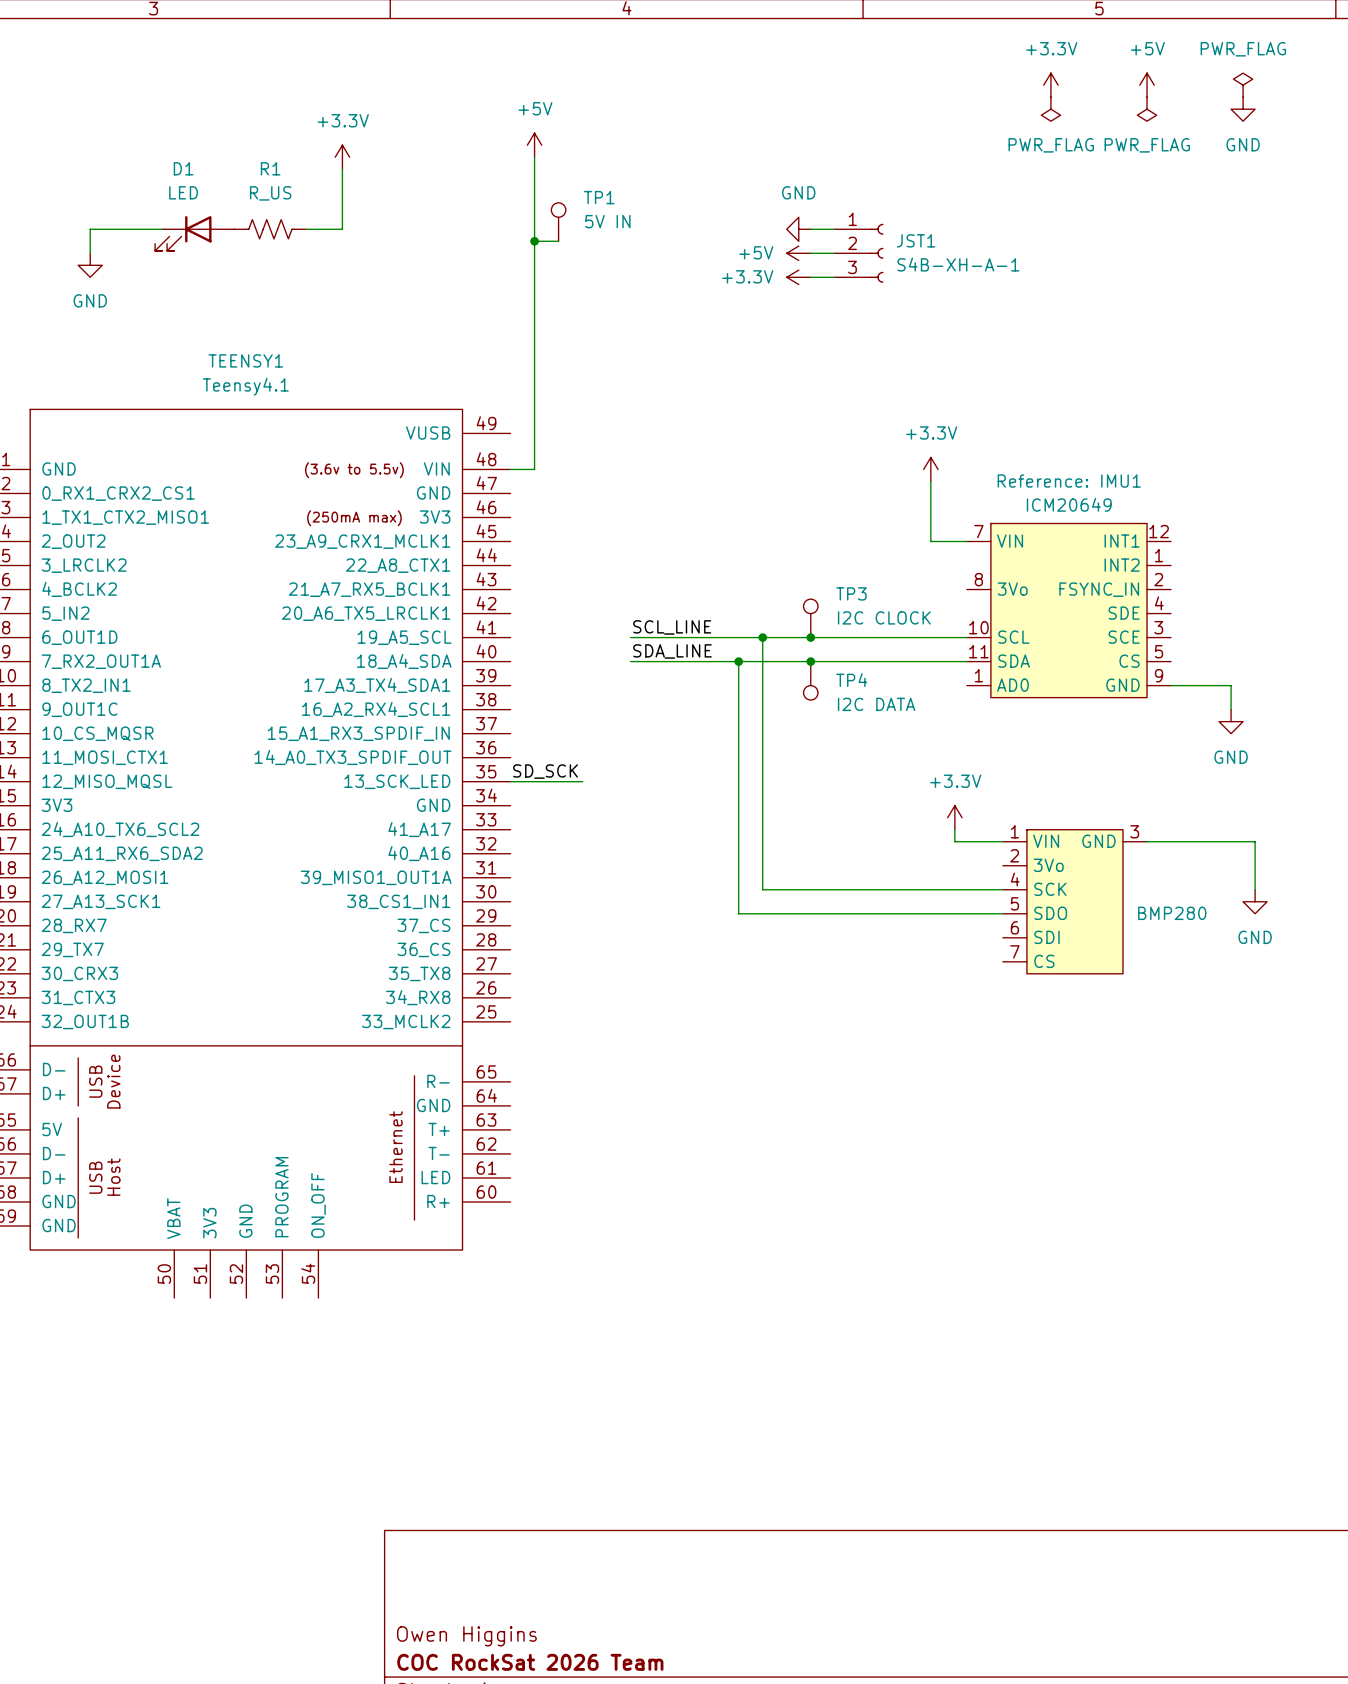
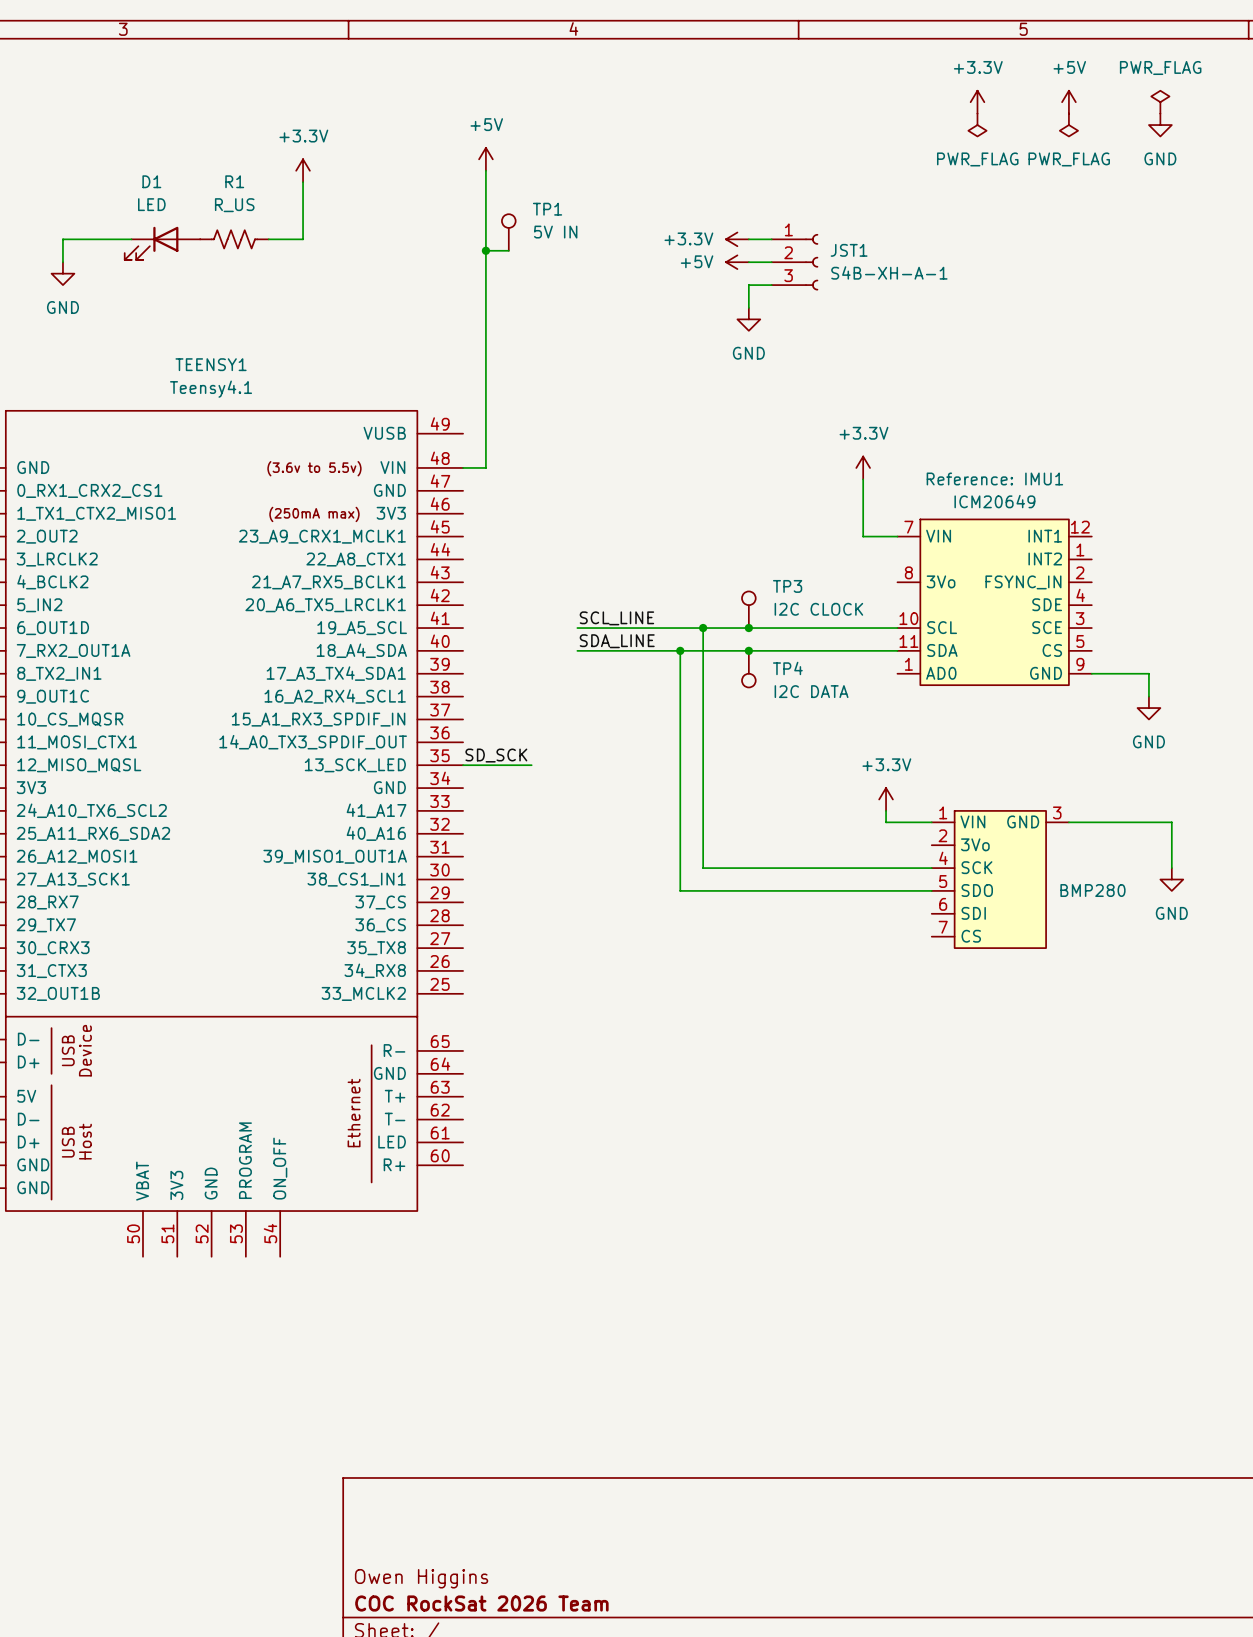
power symbol: GND (798, 229) -> +3.3V (737, 239)
power symbol: +3.3V (798, 277) -> none
wire: none -> (748, 285) (748, 307)
power symbol: none -> GND (748, 319)

